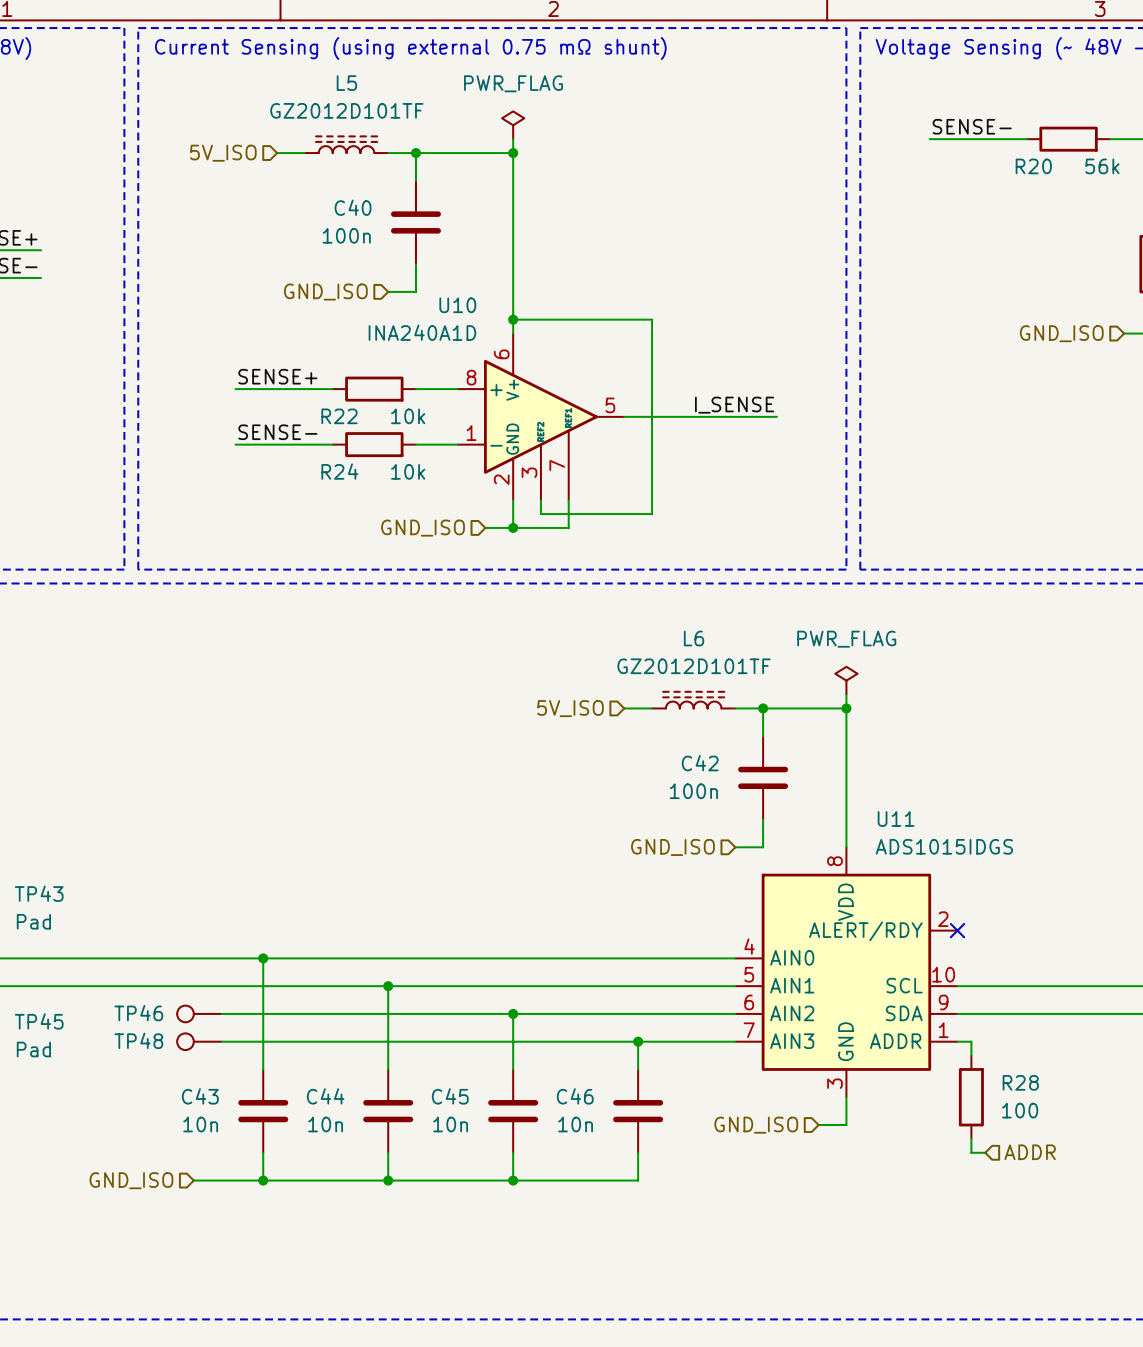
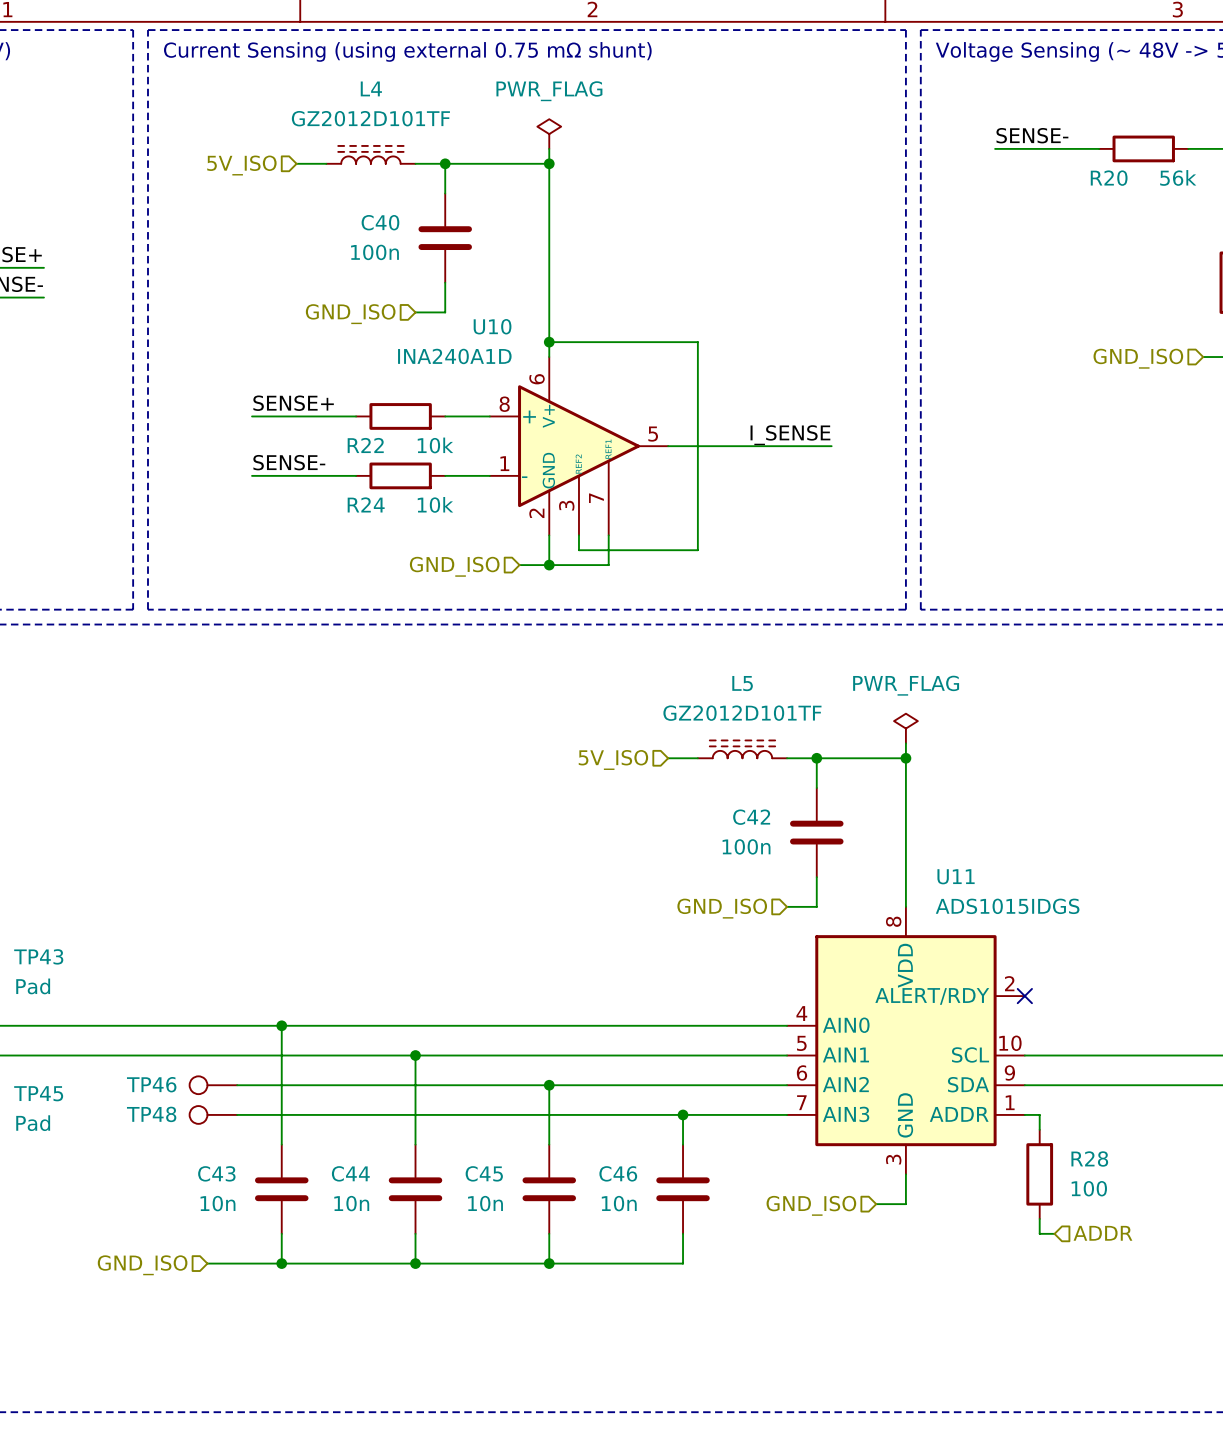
L5 name: L5 (346, 83) -> L4 (371, 88)
L6 name: L6 (694, 638) -> L5 (742, 683)

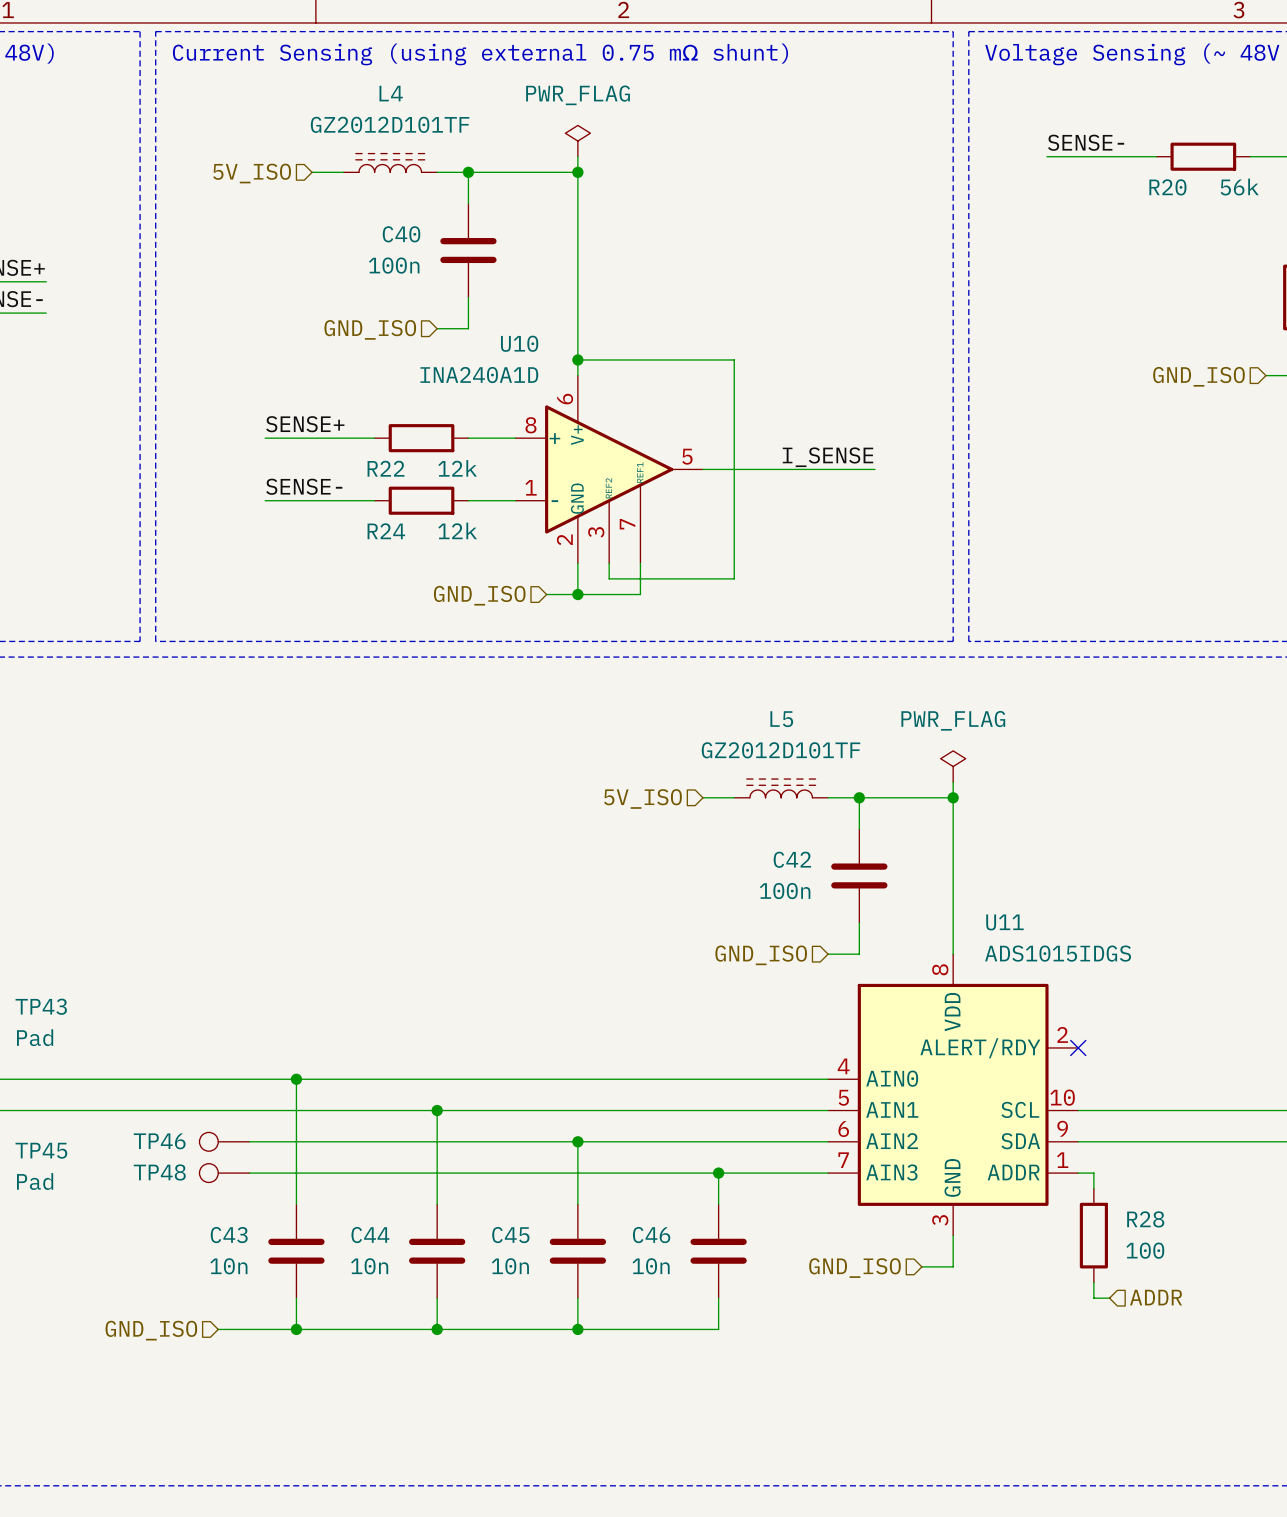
R22 value: 10k (435, 445) -> 12k (457, 468)
R24 value: 10k (435, 504) -> 12k (457, 530)

